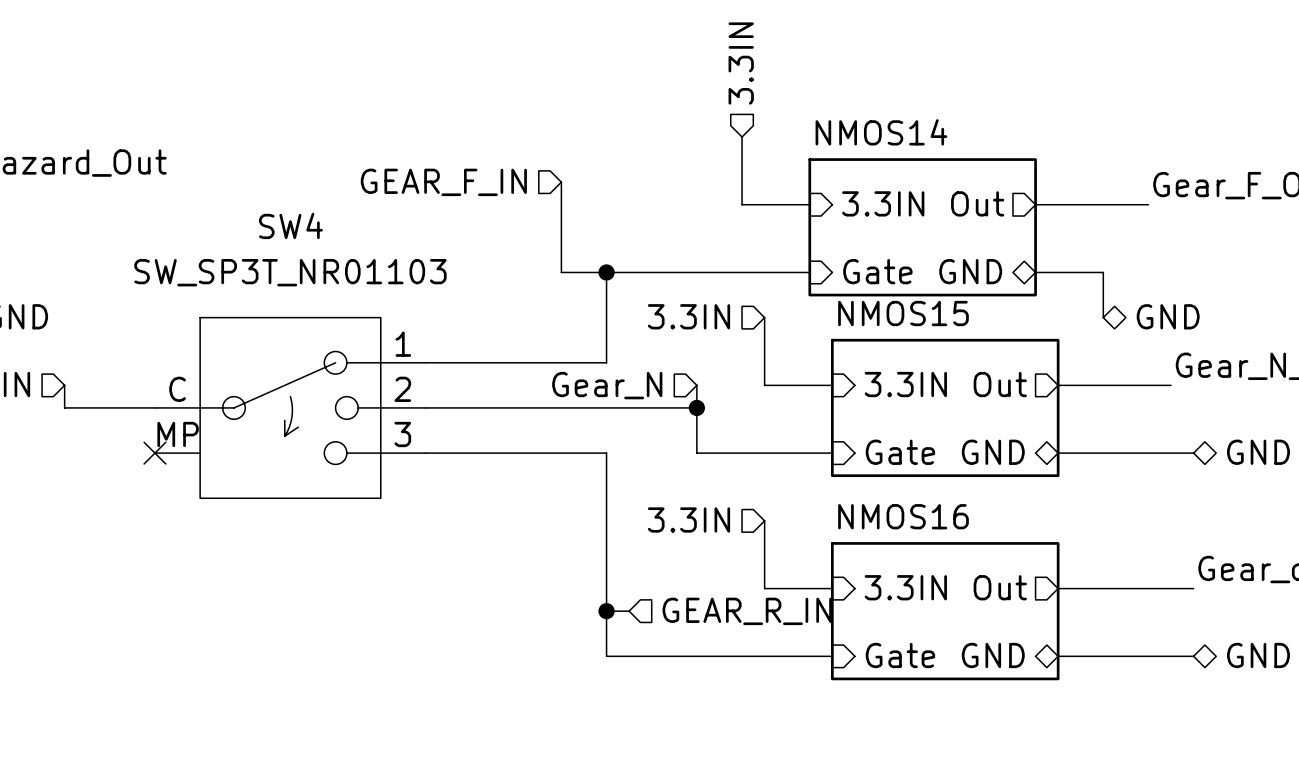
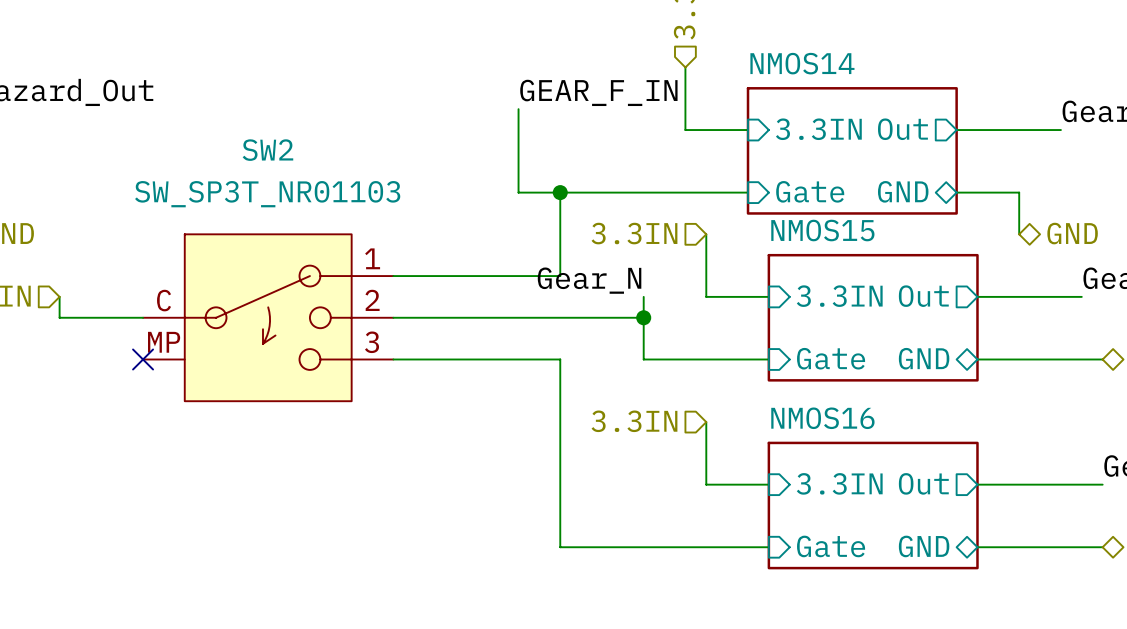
label: none -> GEAR_F_IN (598, 92)
hierarchical label: GEAR_F_IN (443, 182) -> none
SW4 name: SW4 (290, 225) -> SW2 (267, 150)
label: none -> Gear_N (589, 280)
hierarchical label: Gear_N (607, 385) -> none
wire: (606, 611) (629, 611) -> none
junction: (606, 611) -> none
hierarchical label: GEAR_R_IN (747, 611) -> none

